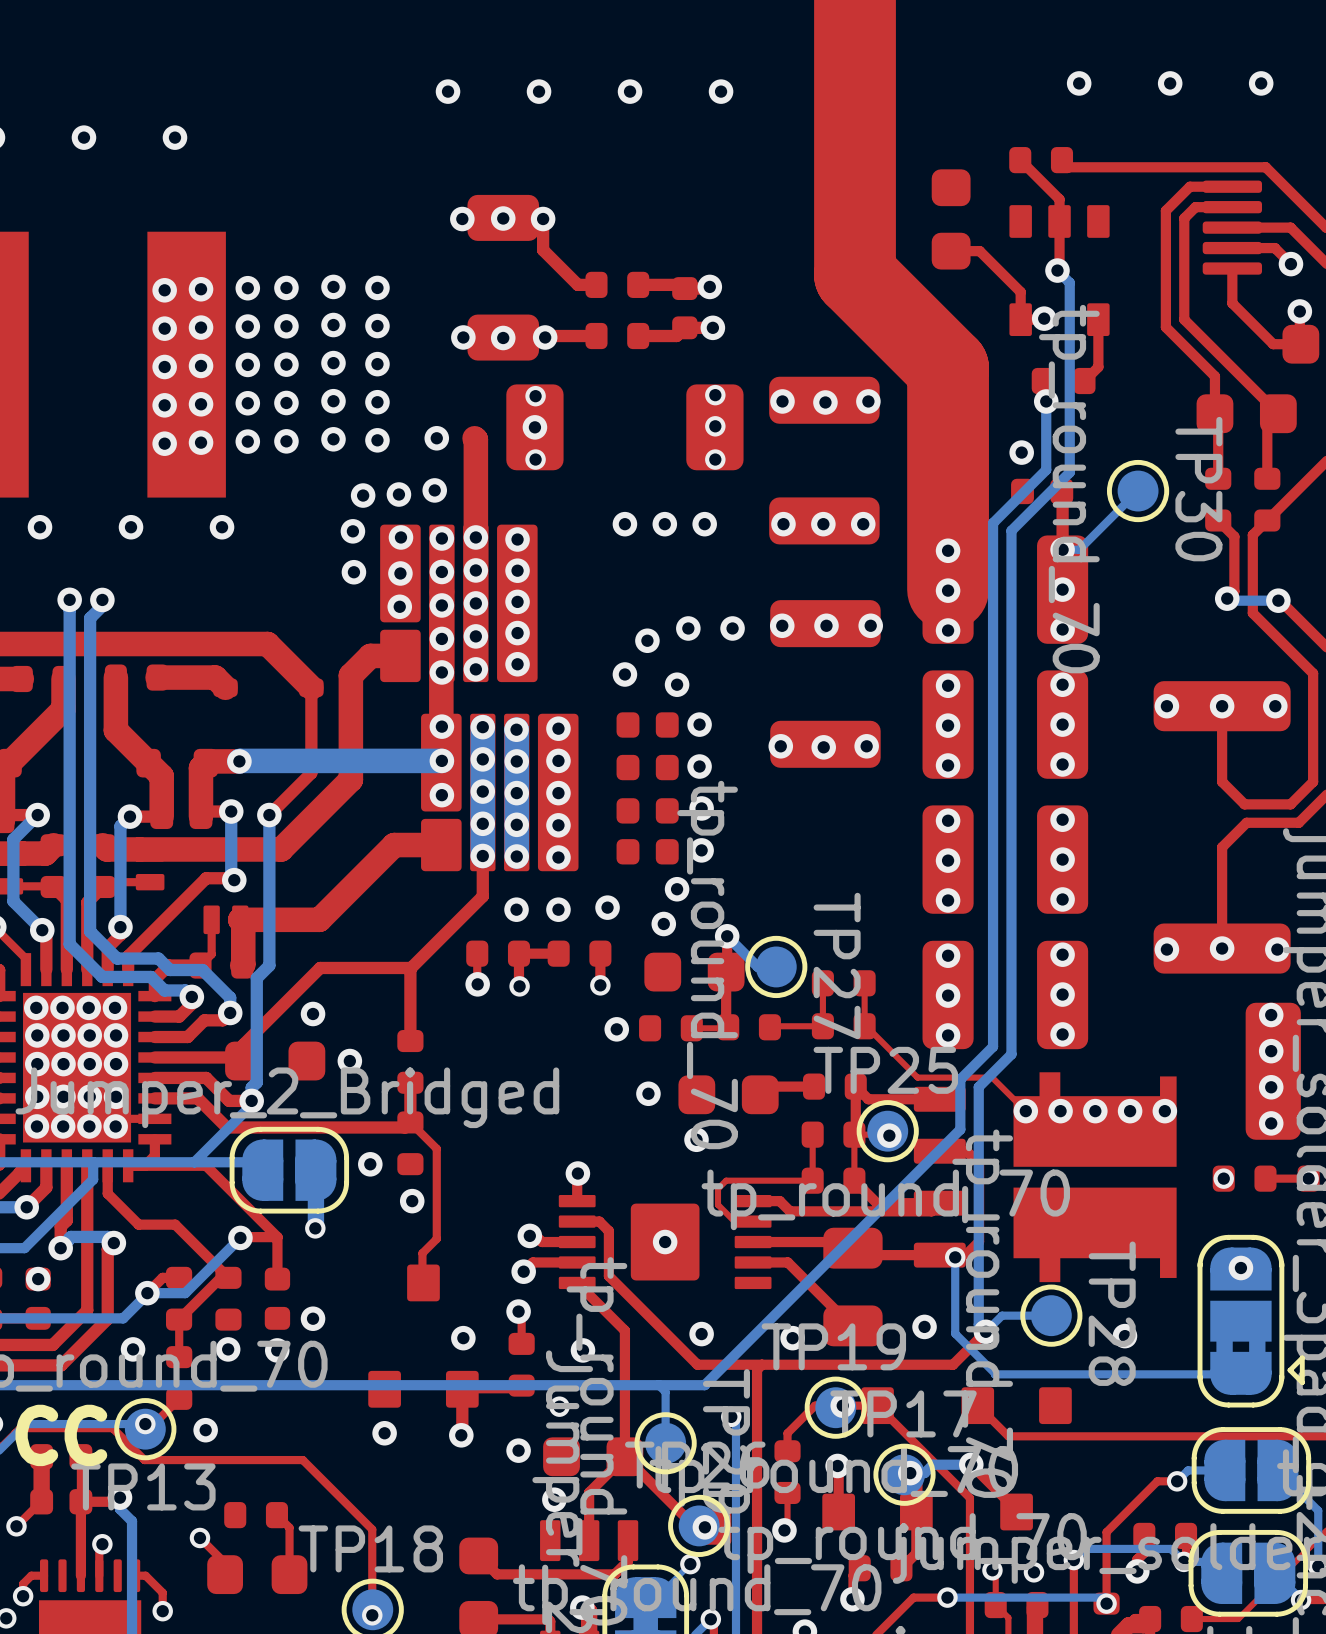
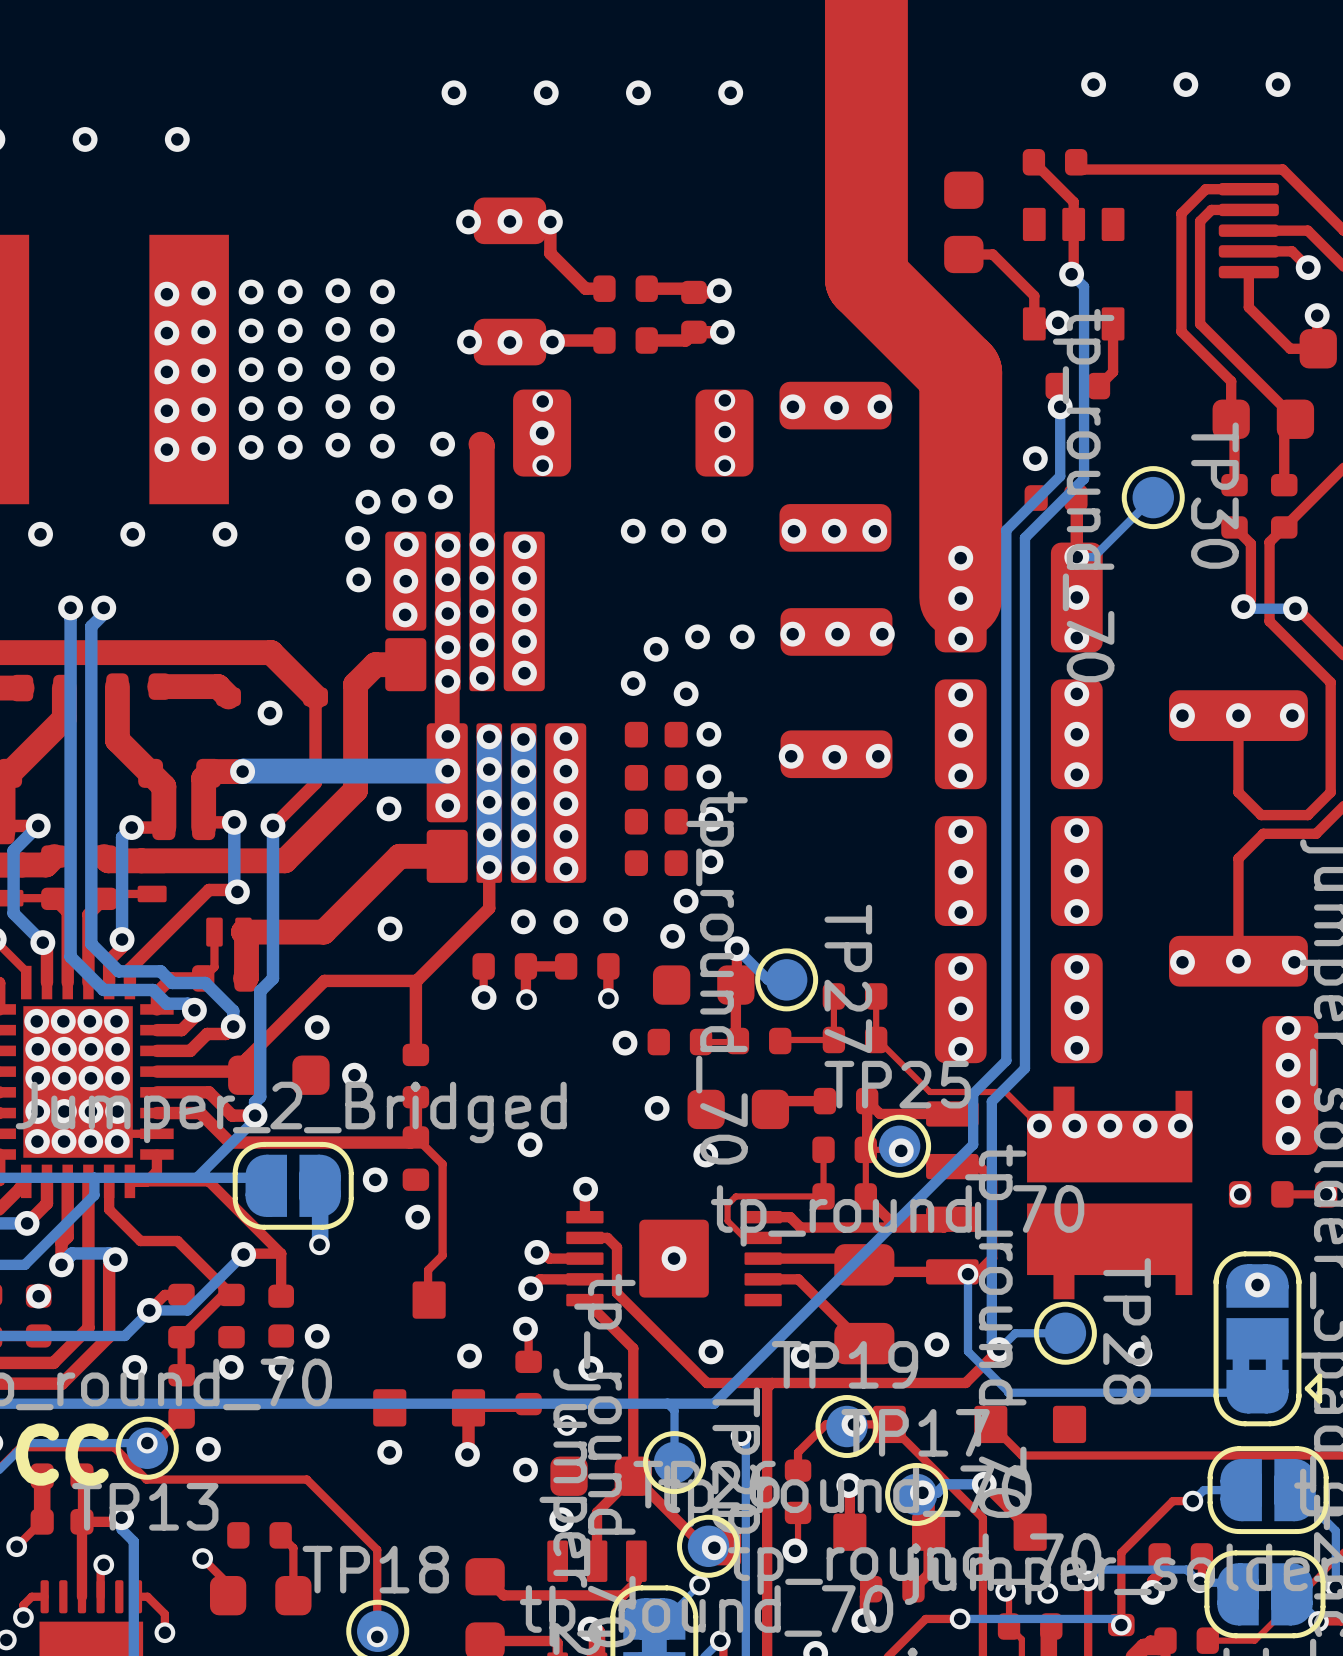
via: none -> (270, 713)
via: none -> (389, 808)
via: none -> (390, 928)
via: none -> (530, 1144)

